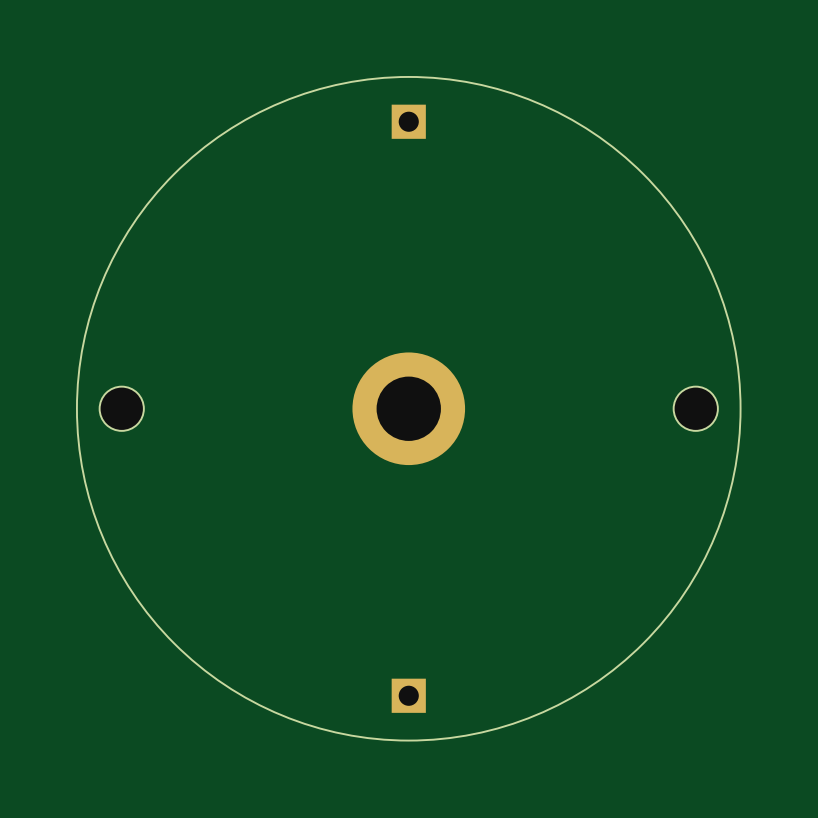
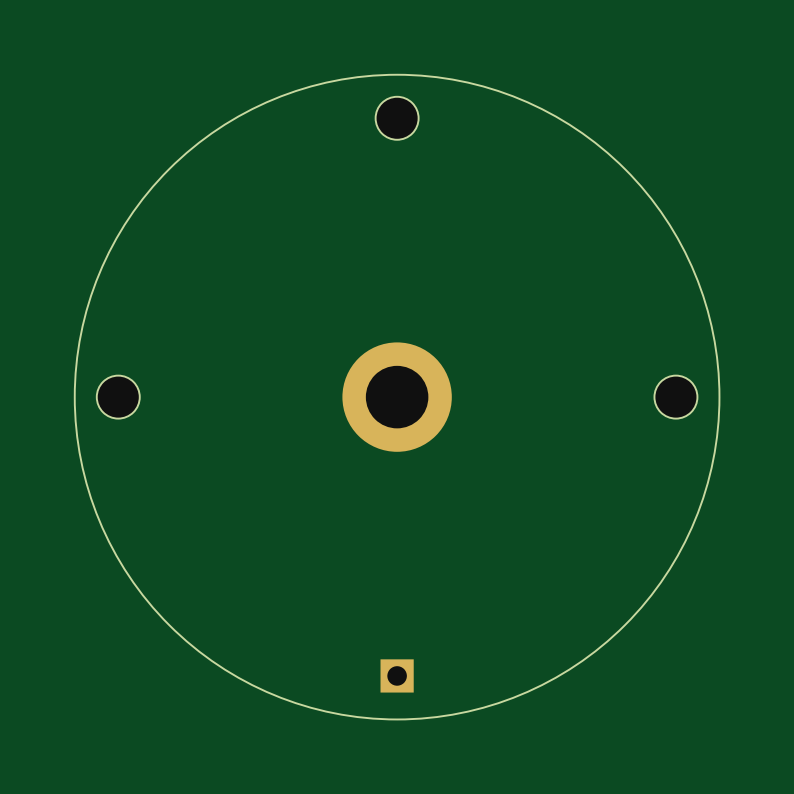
part footprint: [391, 104, 426, 139] -> [375, 96, 419, 140]

